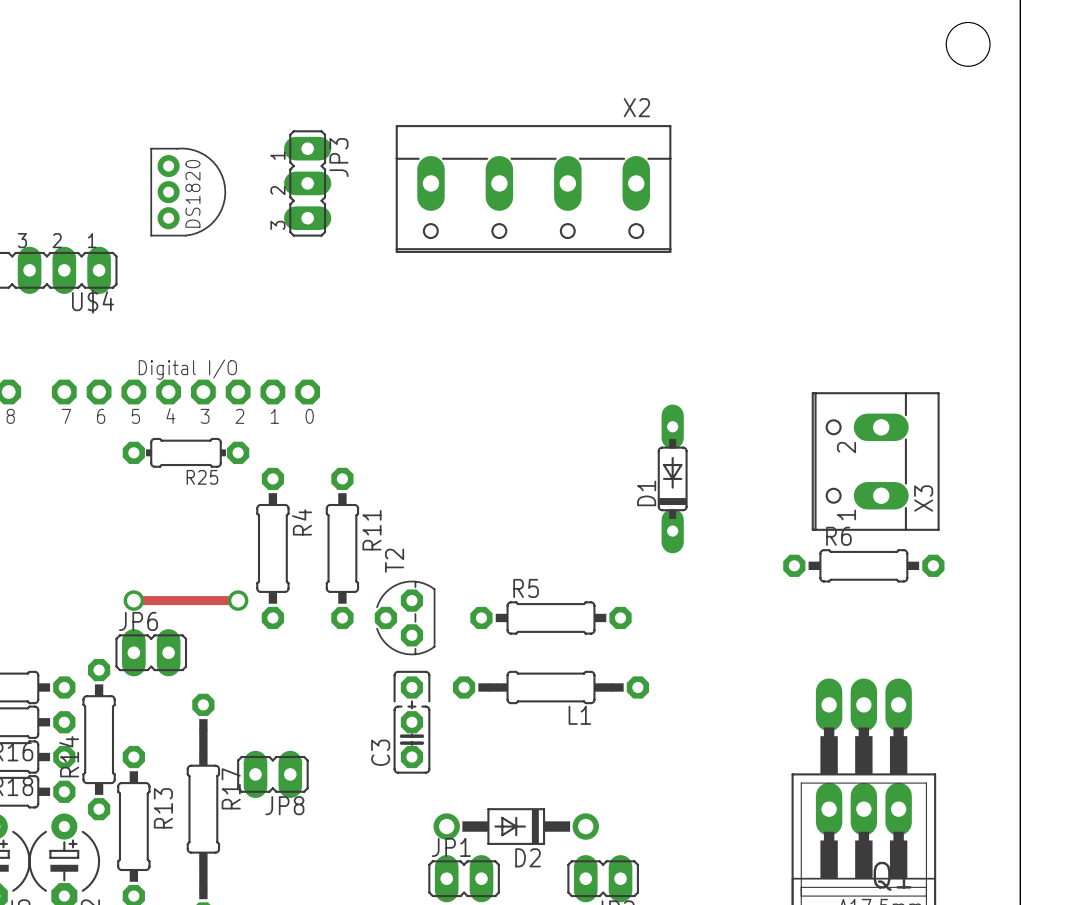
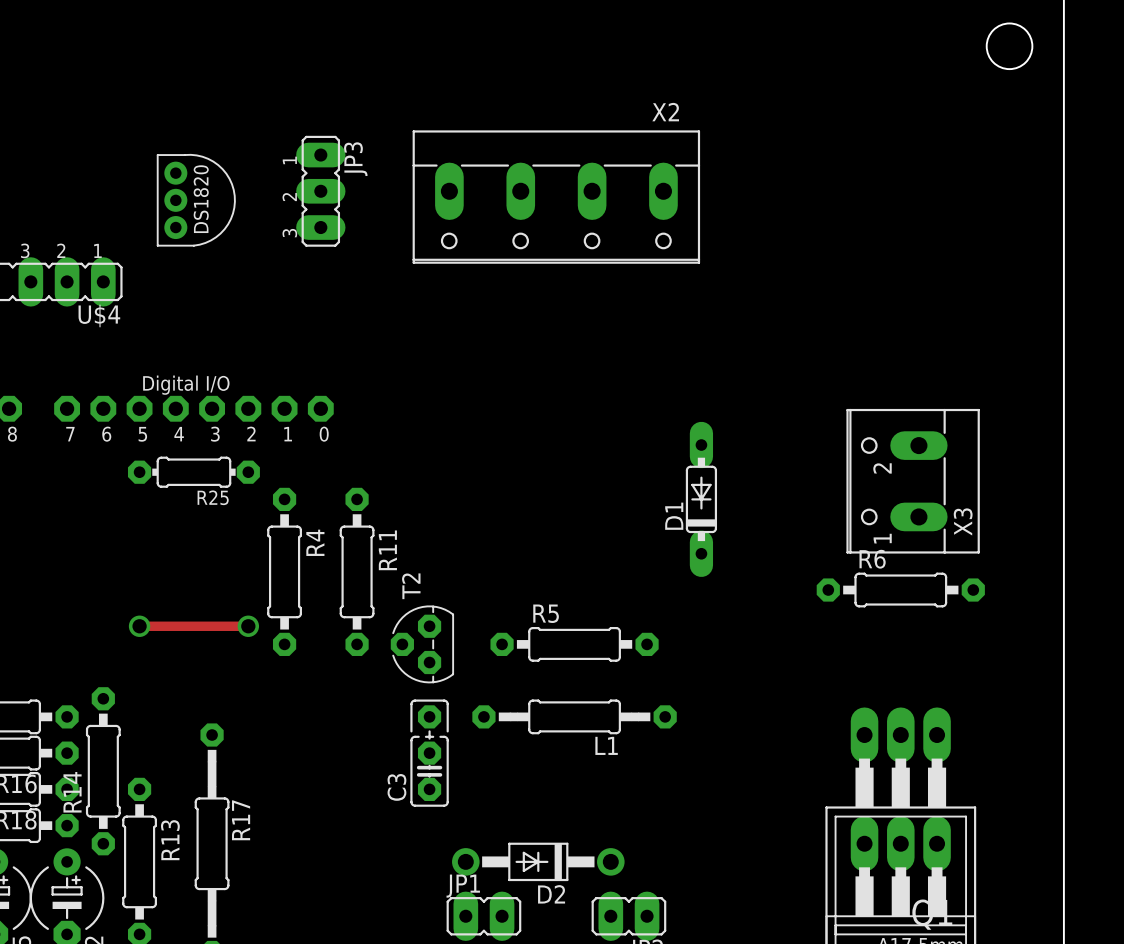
JP6: (151, 652) -> none
JP8: (272, 774) -> none

